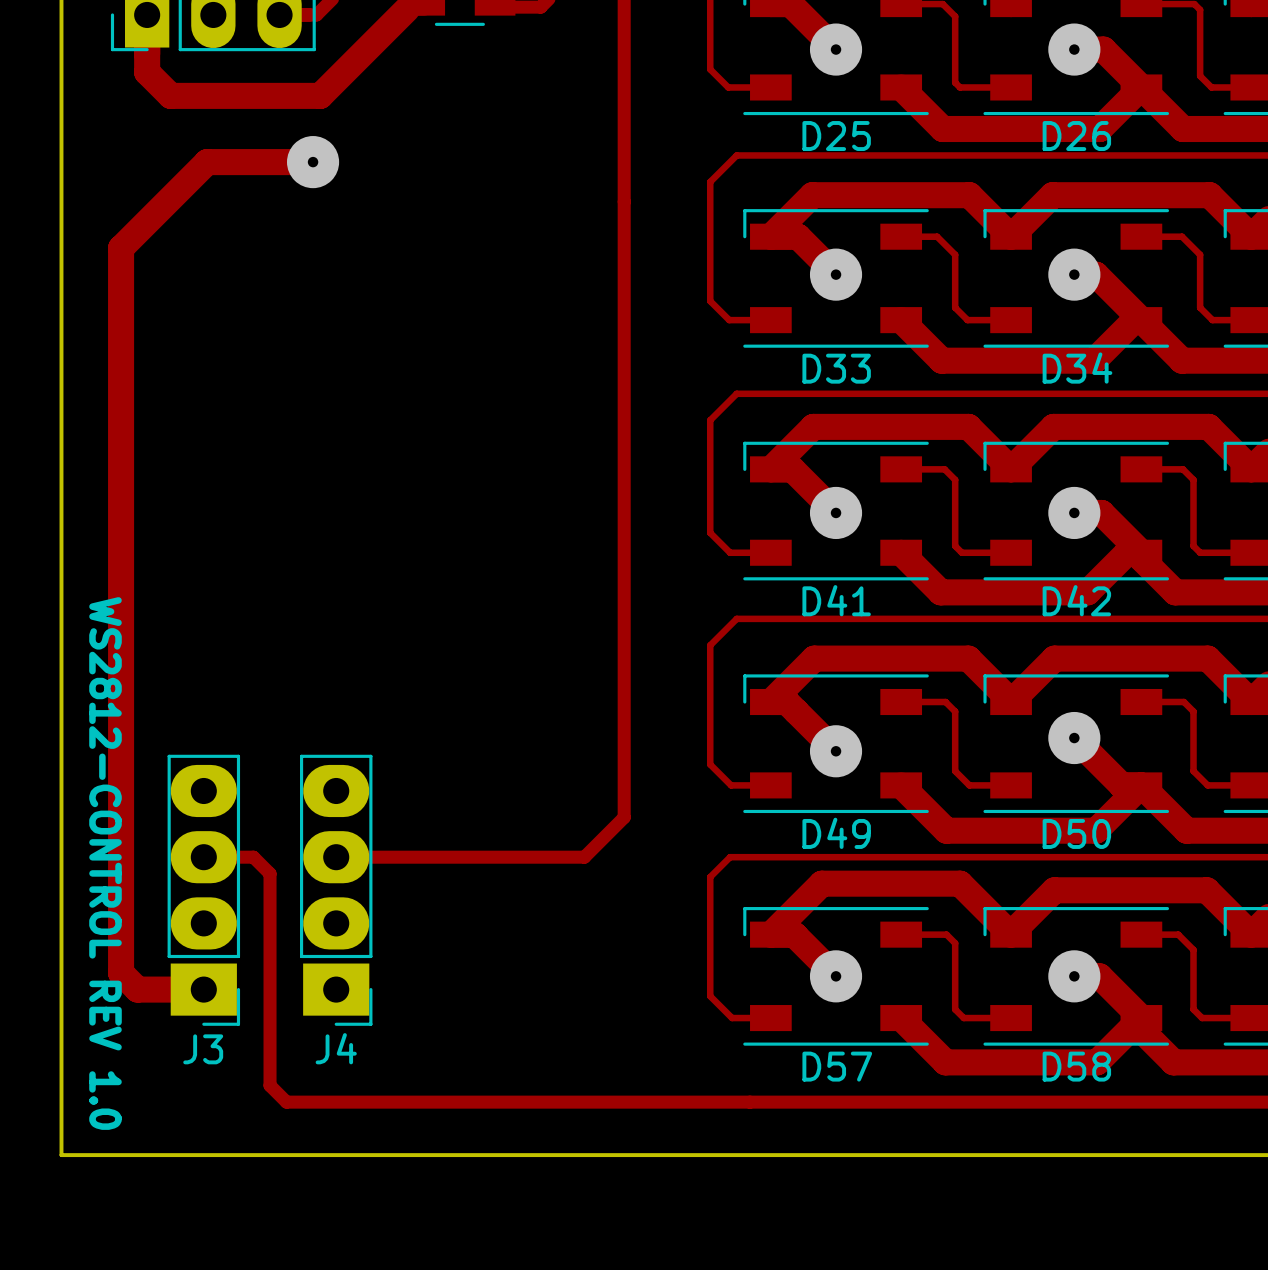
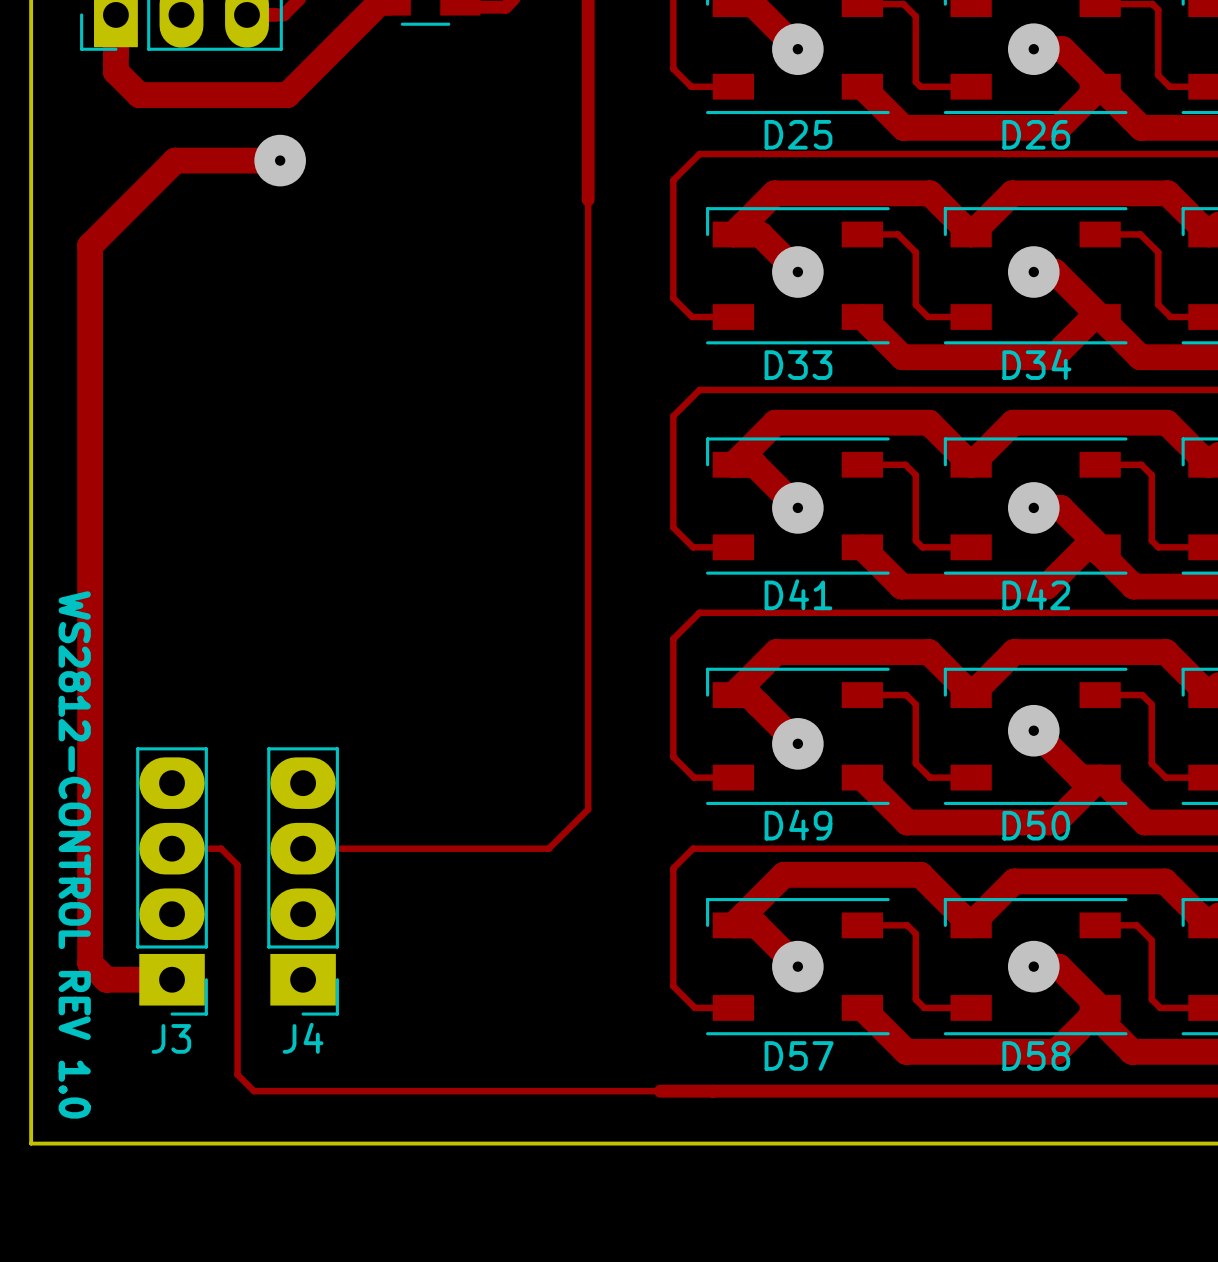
track width: thick (624, 201) (624, 817) (584, 857) (336, 857) -> thin (588, 199) (588, 809) (548, 848) (303, 848)
track width: thick (203, 857) (253, 857) (270, 873) (270, 1085) (286, 1102) (697, 1102) -> thin (172, 848) (221, 848) (237, 865) (237, 1074) (253, 1091) (660, 1091)

